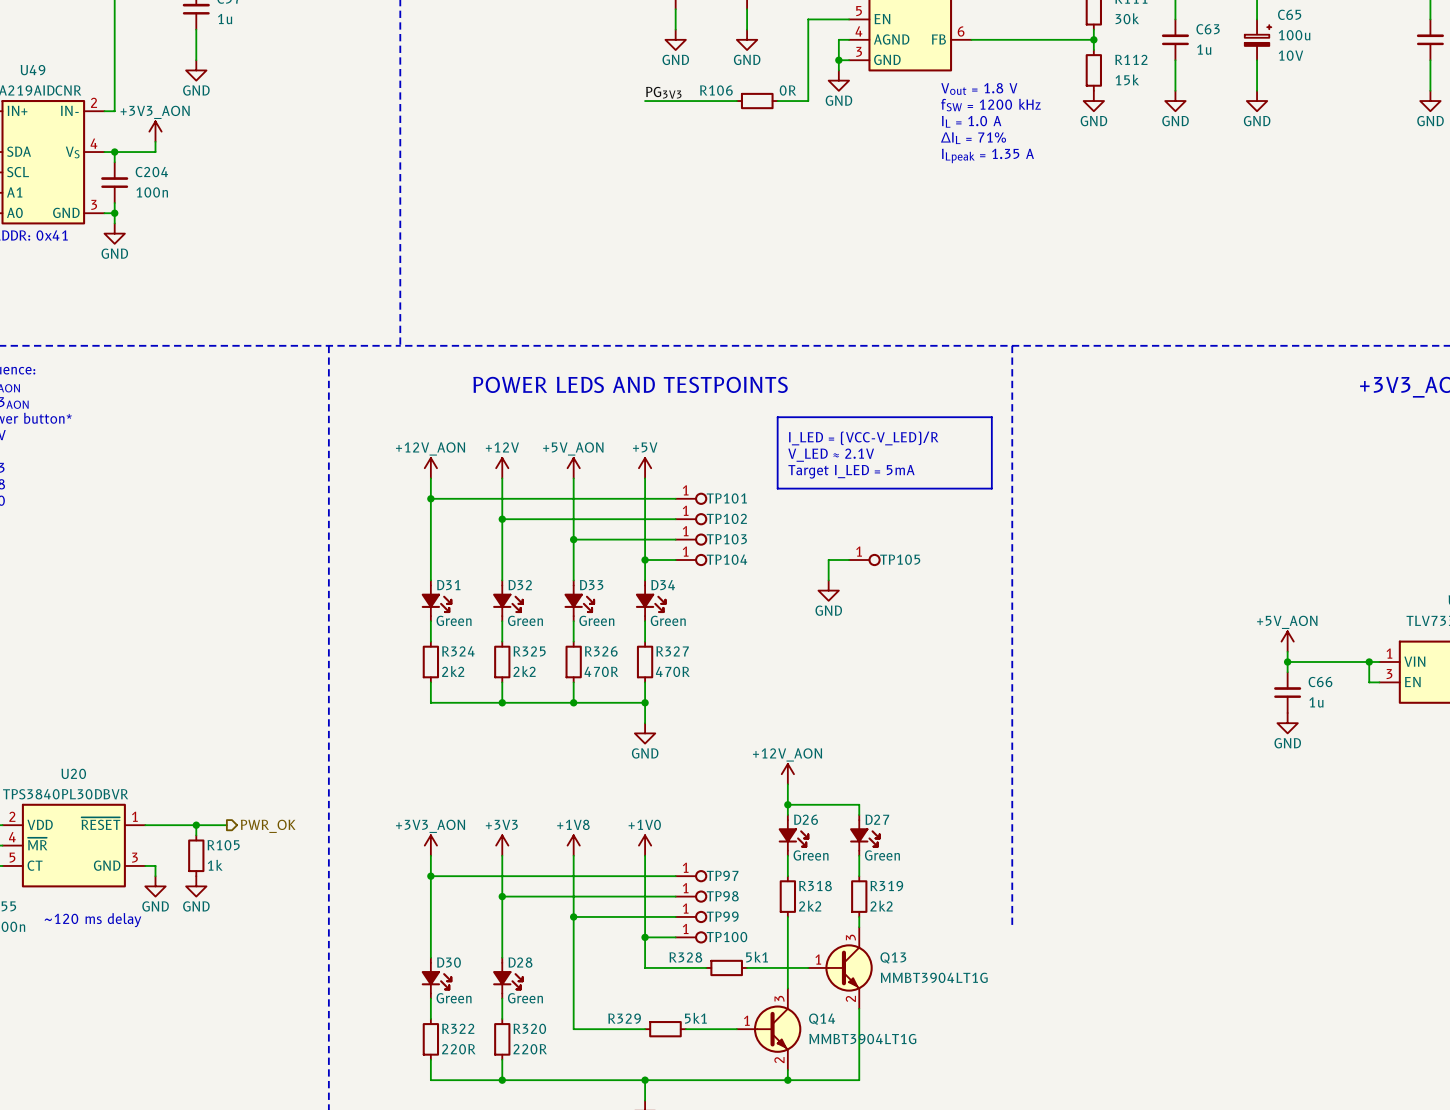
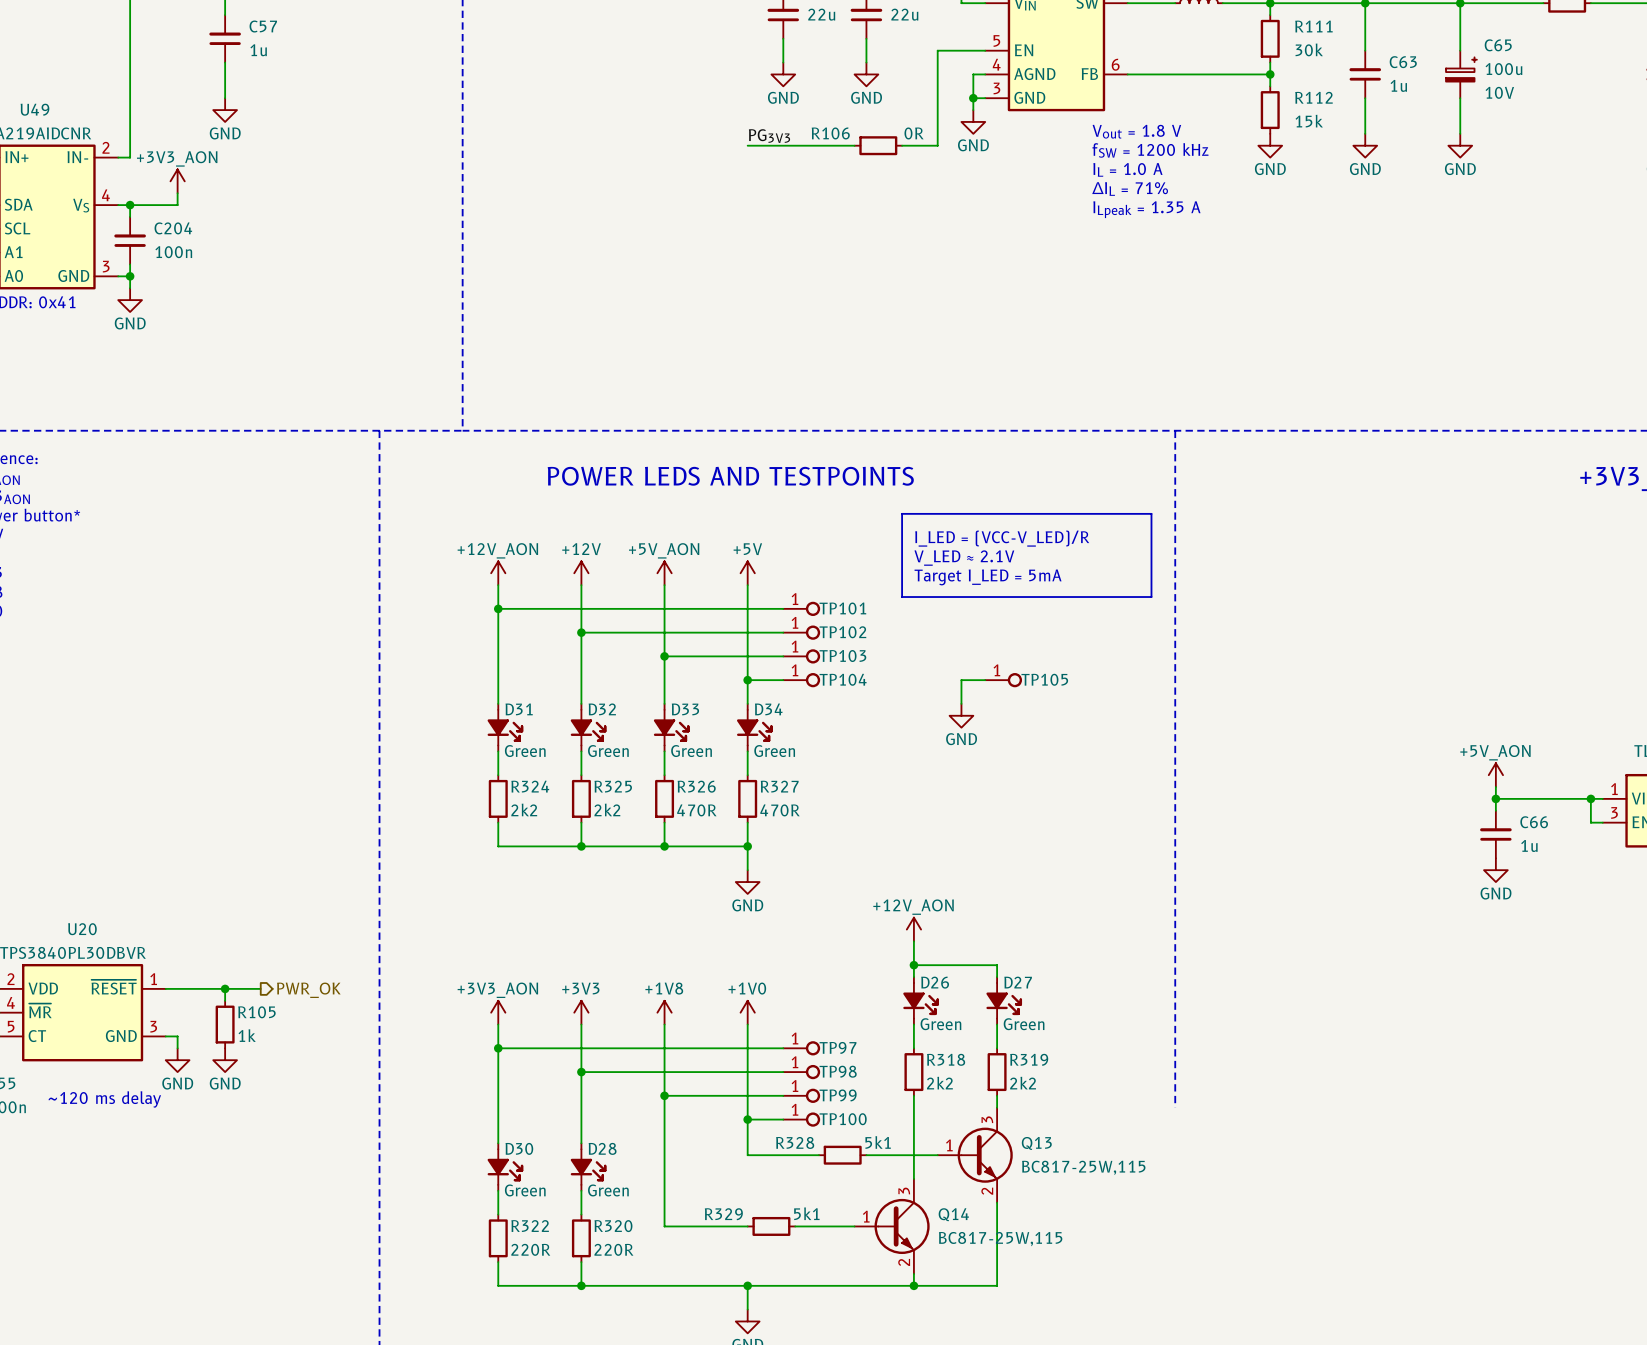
Q13 symbol: [808, 927, 873, 1009] -> [937, 1107, 1013, 1203]
Q13 text: MMBT3904LT1G (934, 977) -> BC817-25W,115 (1083, 1167)
Q14 symbol: [736, 988, 802, 1070] -> [854, 1178, 930, 1274]
Q14 text: MMBT3904LT1G (862, 1039) -> BC817-25W,115 (1000, 1239)

